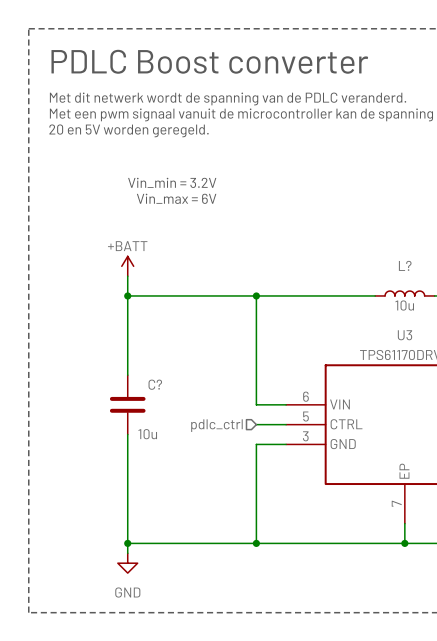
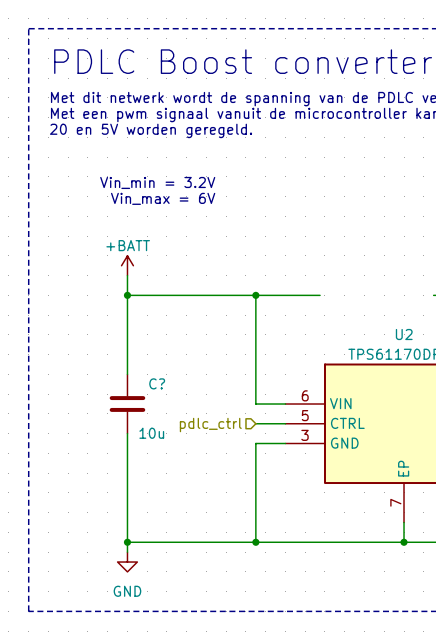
L?: 10u (404, 293) -> none
wire: (320, 295) (375, 295) -> none
U3 name: U3 (404, 335) -> U2 (404, 334)

